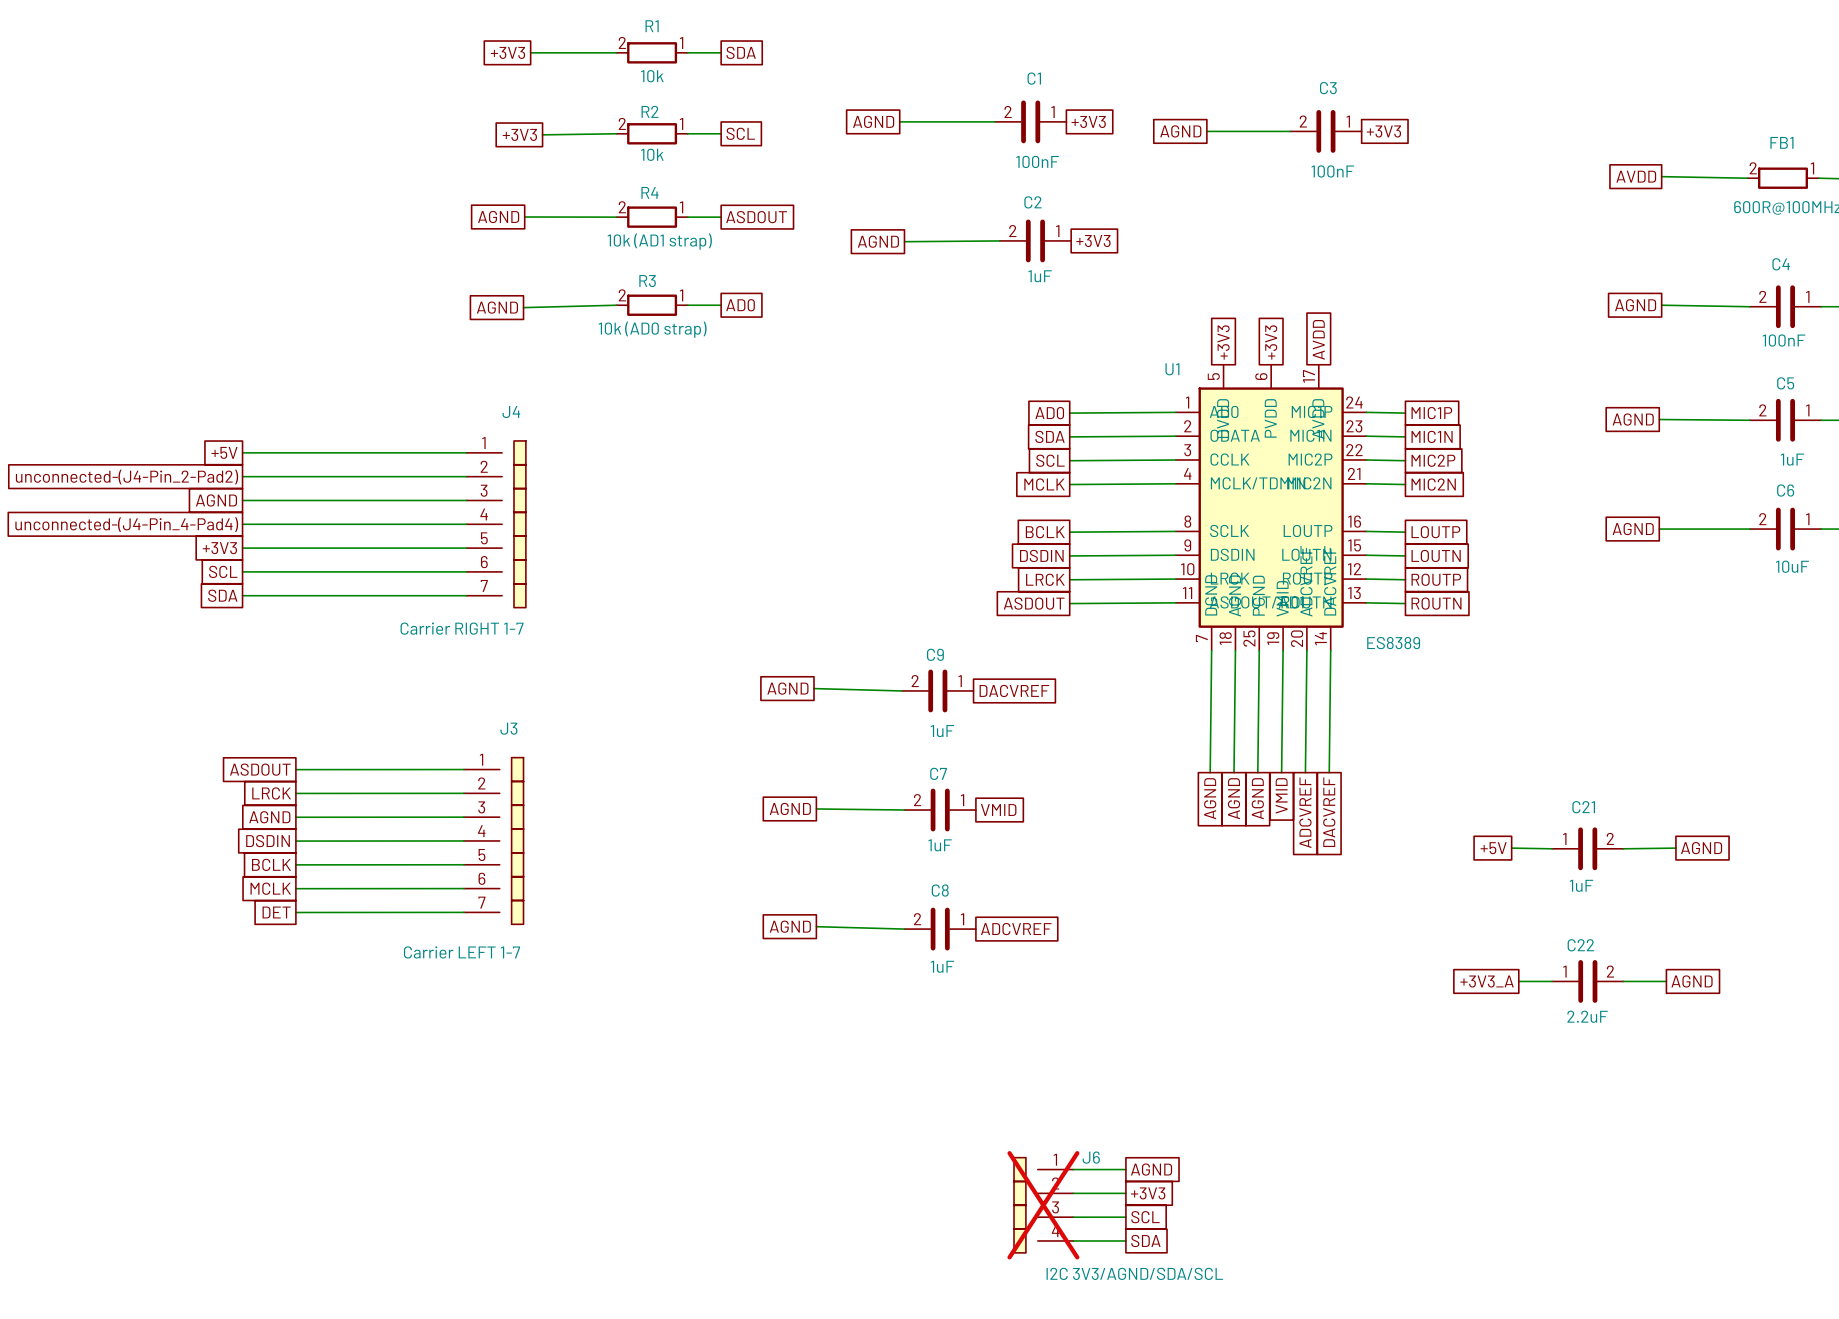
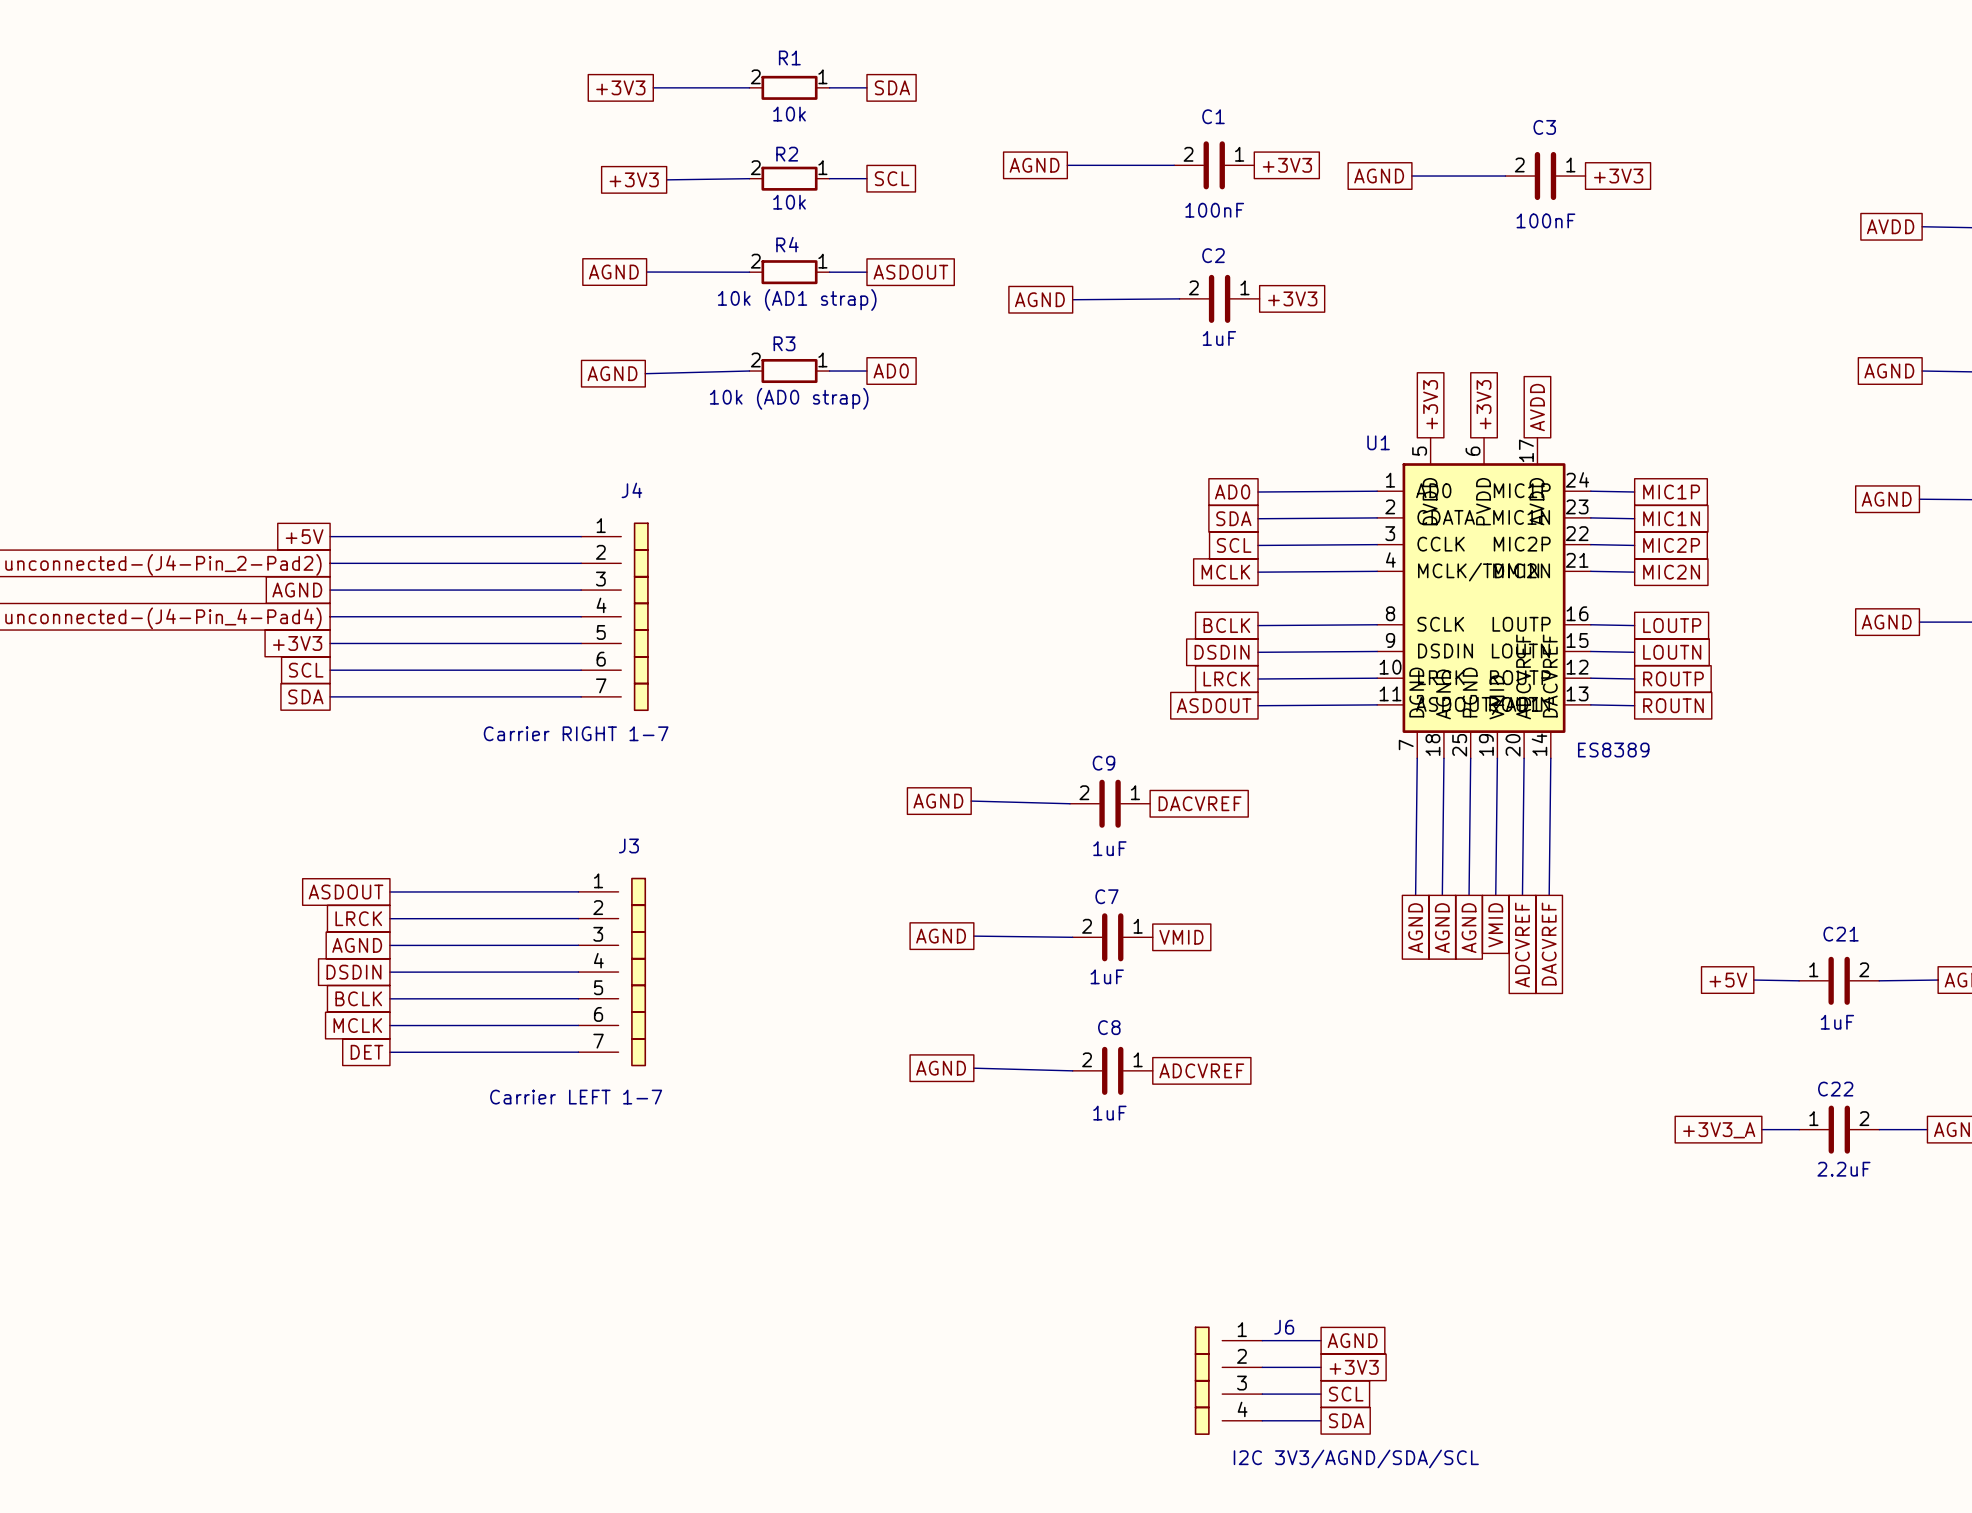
J6 do-not-place cross: (1043, 1205) -> none

